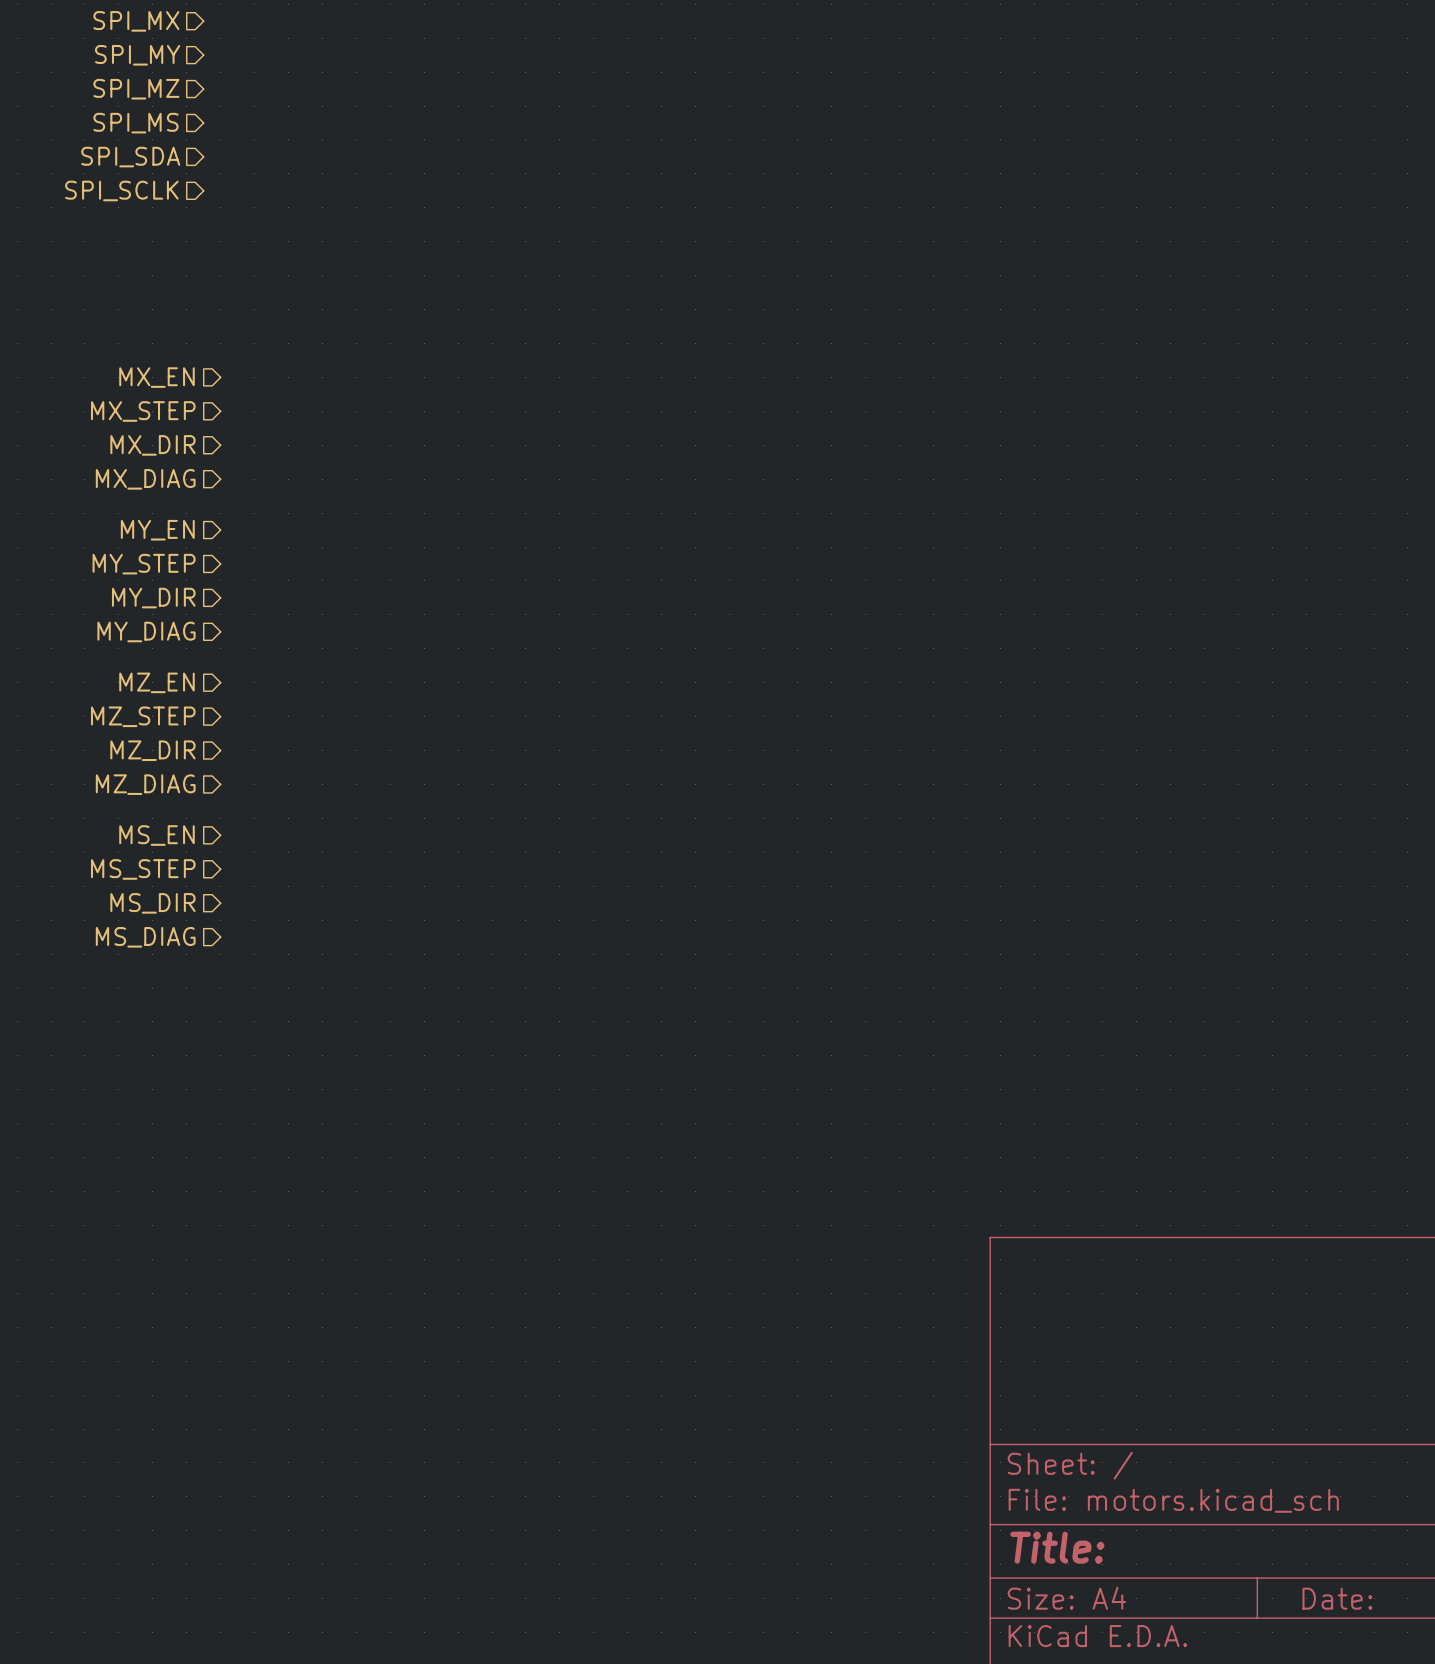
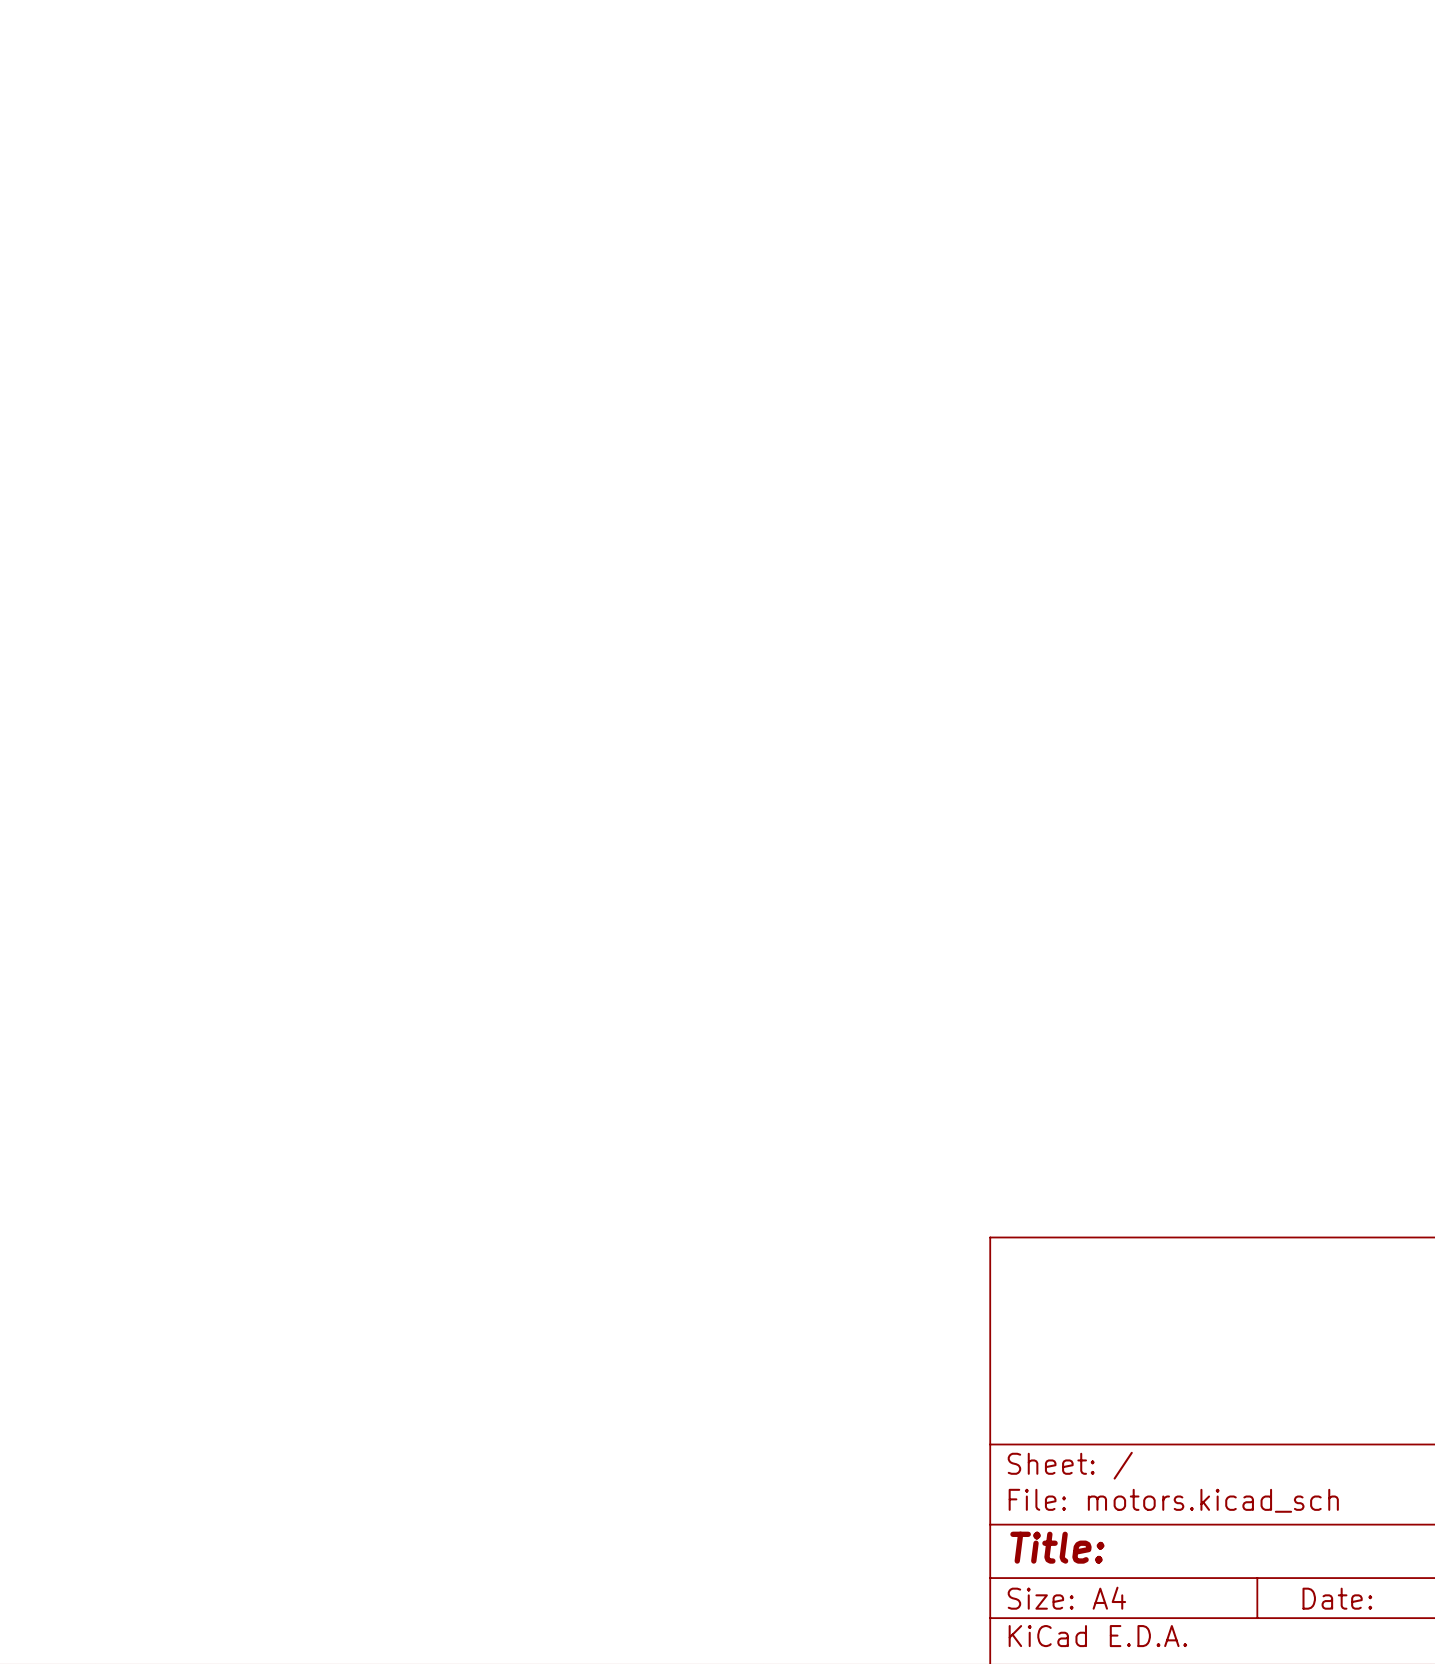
hierarchical label: SPI_MX (136, 21) -> none
hierarchical label: SPI_MY (137, 55) -> none
hierarchical label: SPI_MZ (136, 89) -> none
hierarchical label: SPI_MS (135, 123) -> none
hierarchical label: SPI_SDA (130, 157) -> none
hierarchical label: SPI_SCLK (121, 190) -> none
hierarchical label: MX_EN (156, 377) -> none
hierarchical label: MX_STEP (143, 411) -> none
hierarchical label: MX_DIR (152, 445) -> none
hierarchical label: MX_DIAG (145, 479) -> none
hierarchical label: MY_EN (157, 530) -> none
hierarchical label: MY_STEP (144, 564) -> none
hierarchical label: MY_DIR (153, 598) -> none
hierarchical label: MY_DIAG (146, 631) -> none
hierarchical label: MZ_EN (156, 682) -> none
hierarchical label: MZ_STEP (143, 716) -> none
hierarchical label: MZ_DIR (152, 750) -> none
hierarchical label: MZ_DIAG (145, 784) -> none
hierarchical label: MS_EN (156, 835) -> none
hierarchical label: MS_STEP (143, 869) -> none
hierarchical label: MS_DIR (152, 903) -> none
hierarchical label: MS_DIAG (145, 937) -> none

